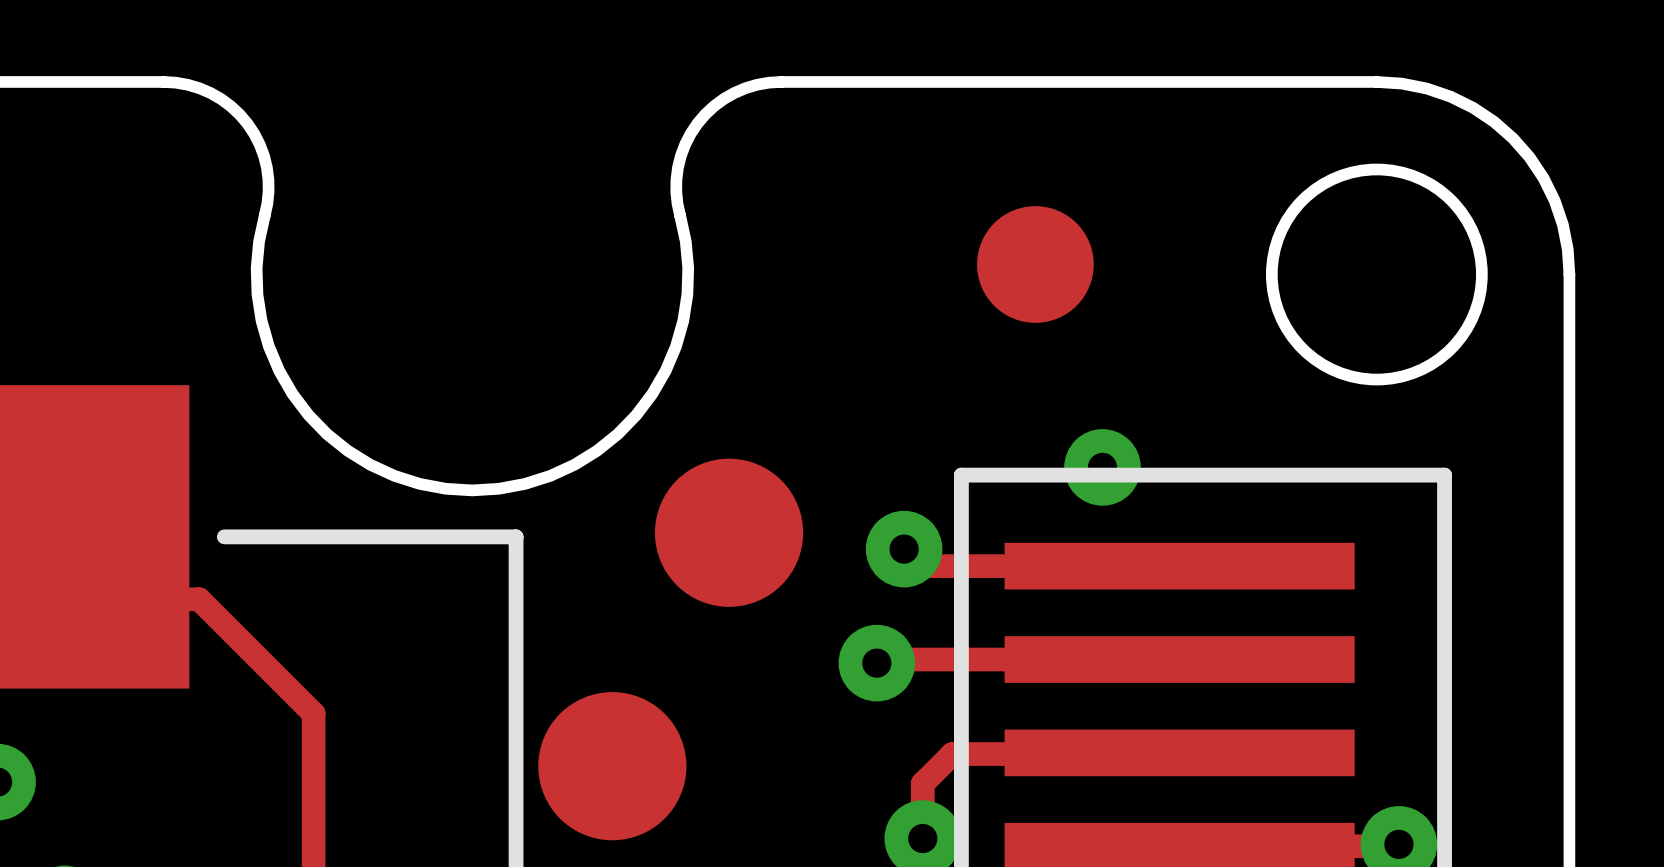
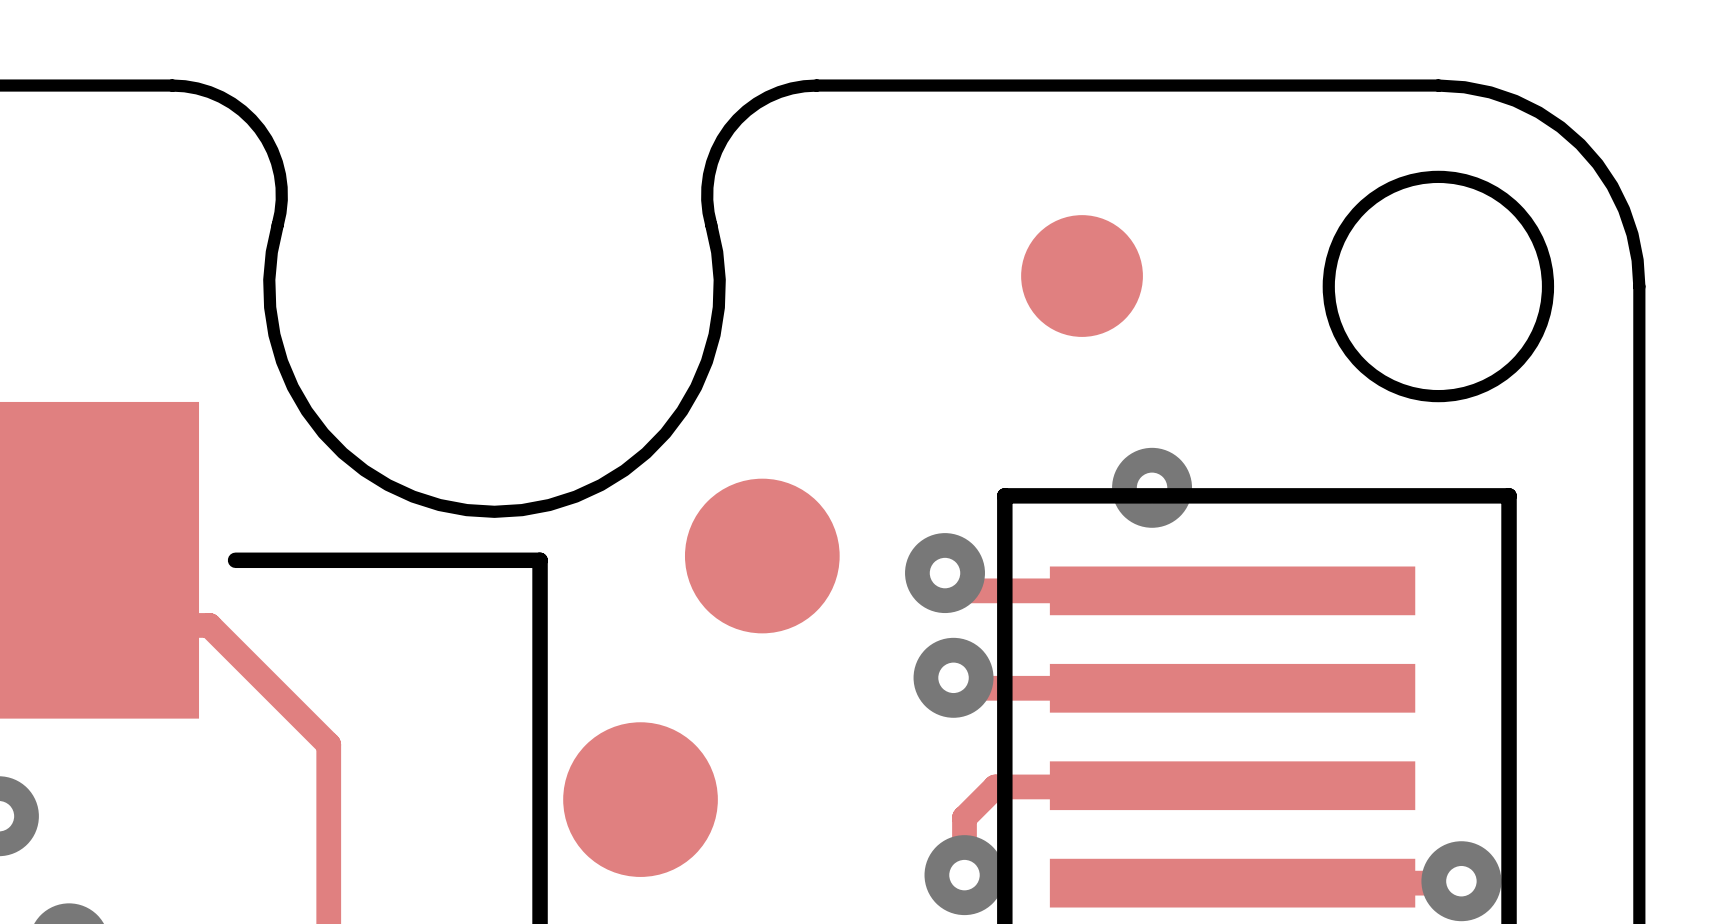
via position: (876, 663) -> (953, 677)

